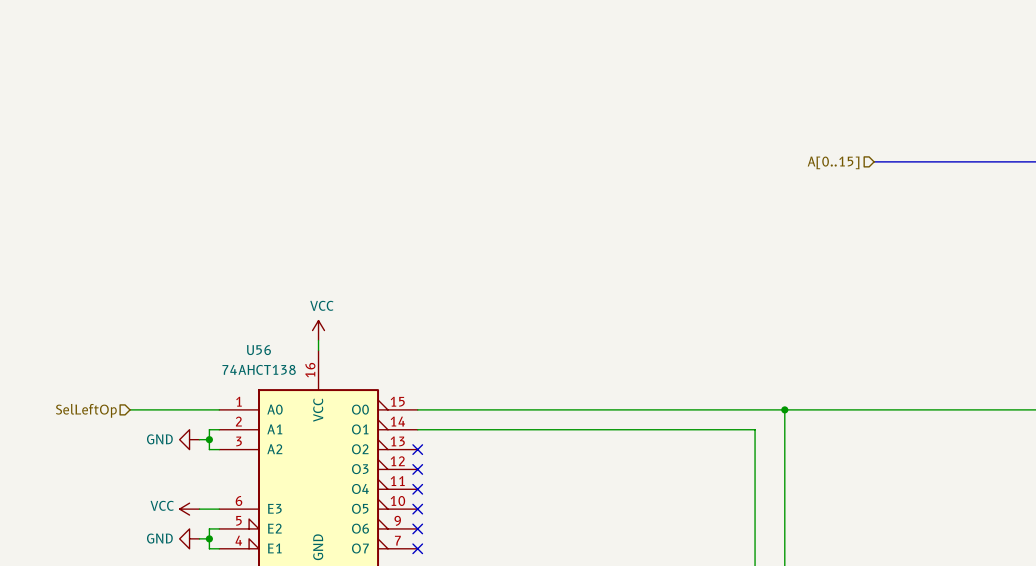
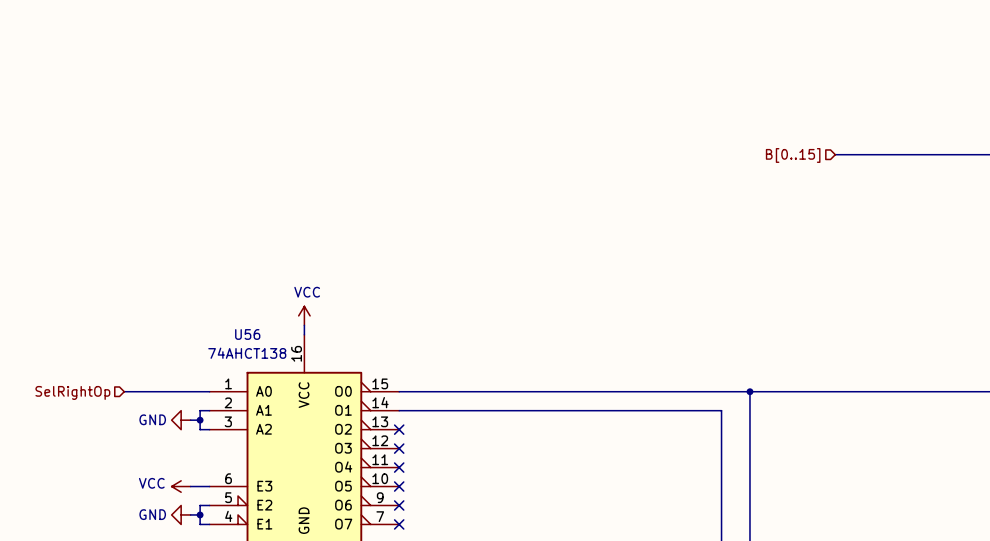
hierarchical label: A[0..15] (833, 162) -> B[0..15] (793, 155)
hierarchical label: SelLeftOp (86, 410) -> SelRightOp (72, 392)

